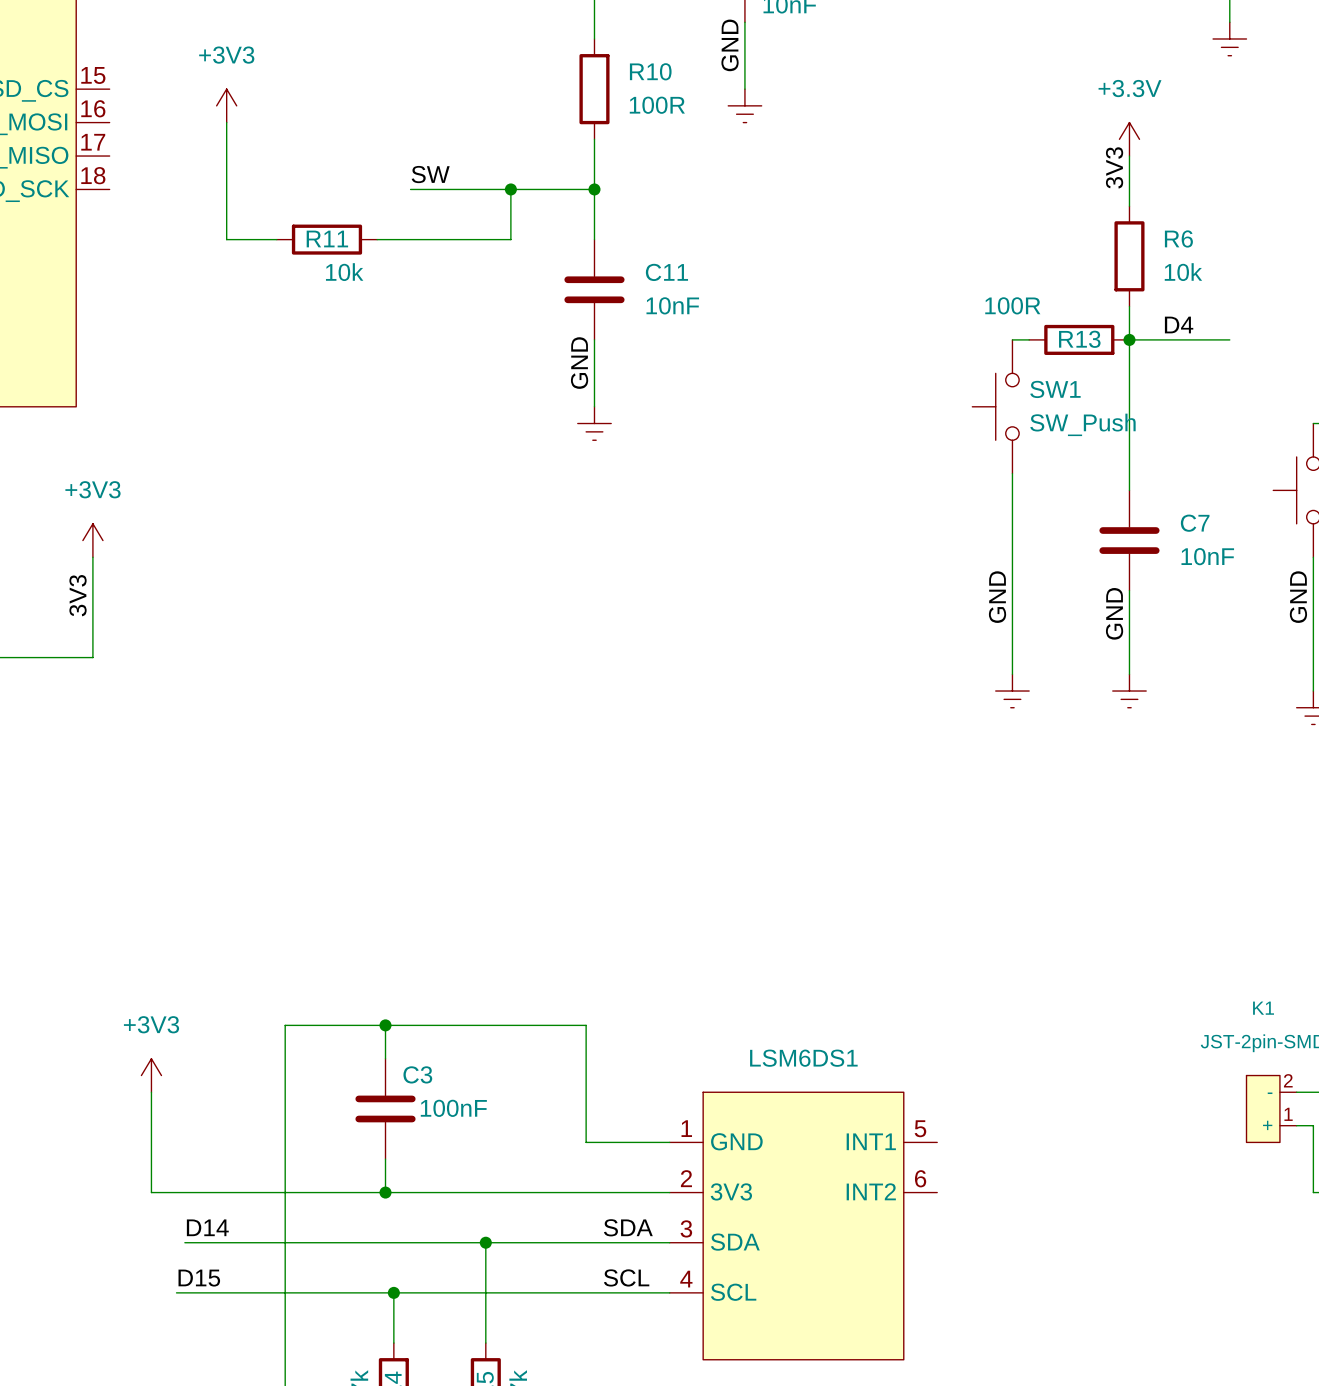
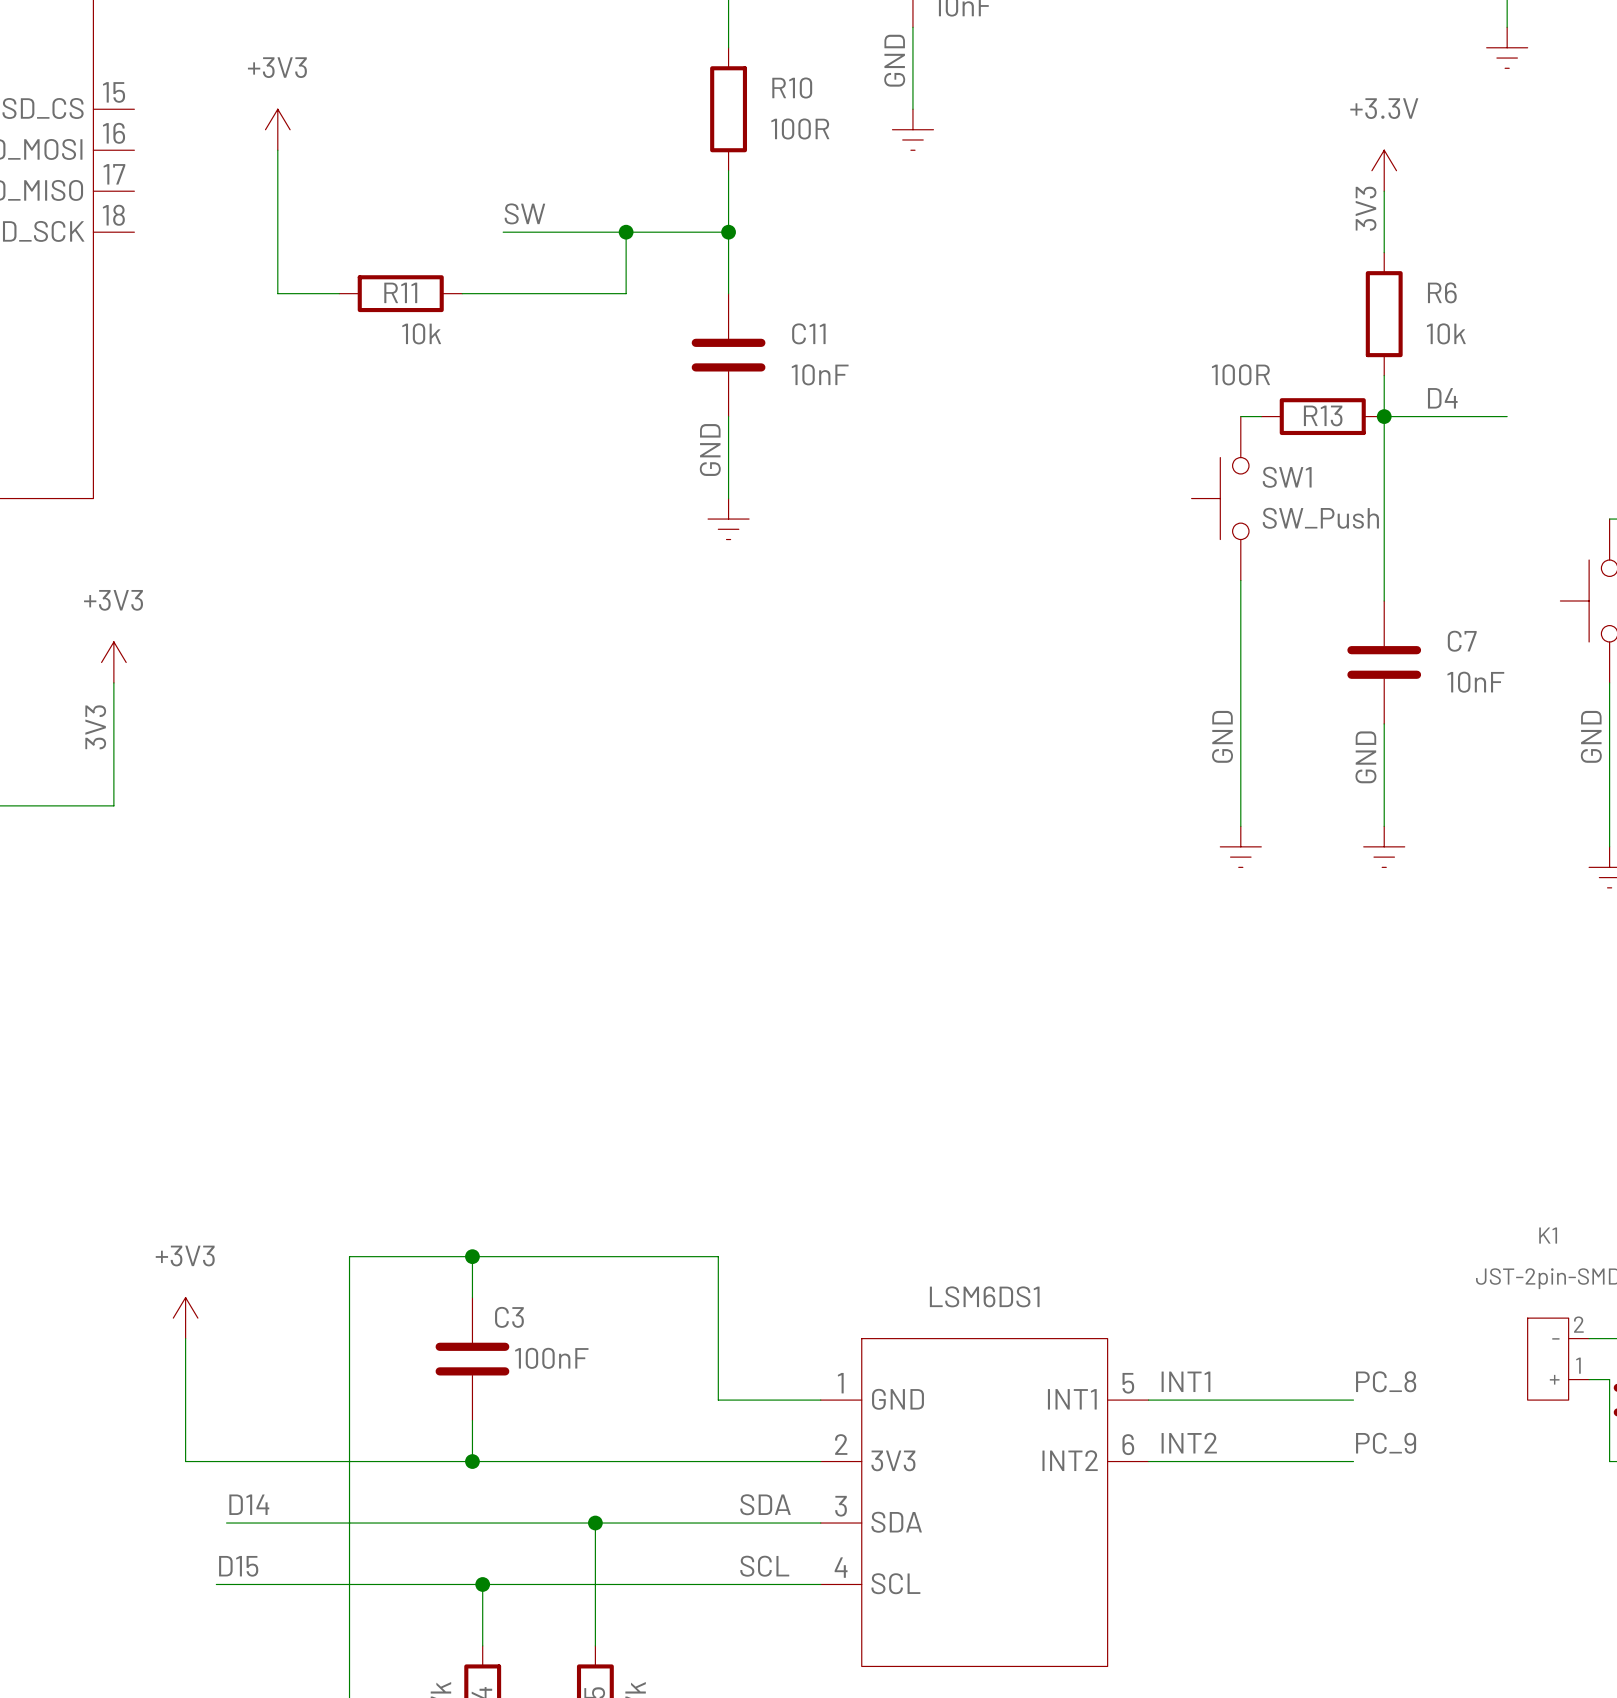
label: none -> INT1 (1185, 1381)
label: none -> PC_8 (1386, 1381)
wire: none -> (1148, 1400) (1353, 1400)
label: none -> INT2 (1189, 1443)
label: none -> PC_9 (1386, 1443)
wire: none -> (1148, 1461) (1353, 1461)

